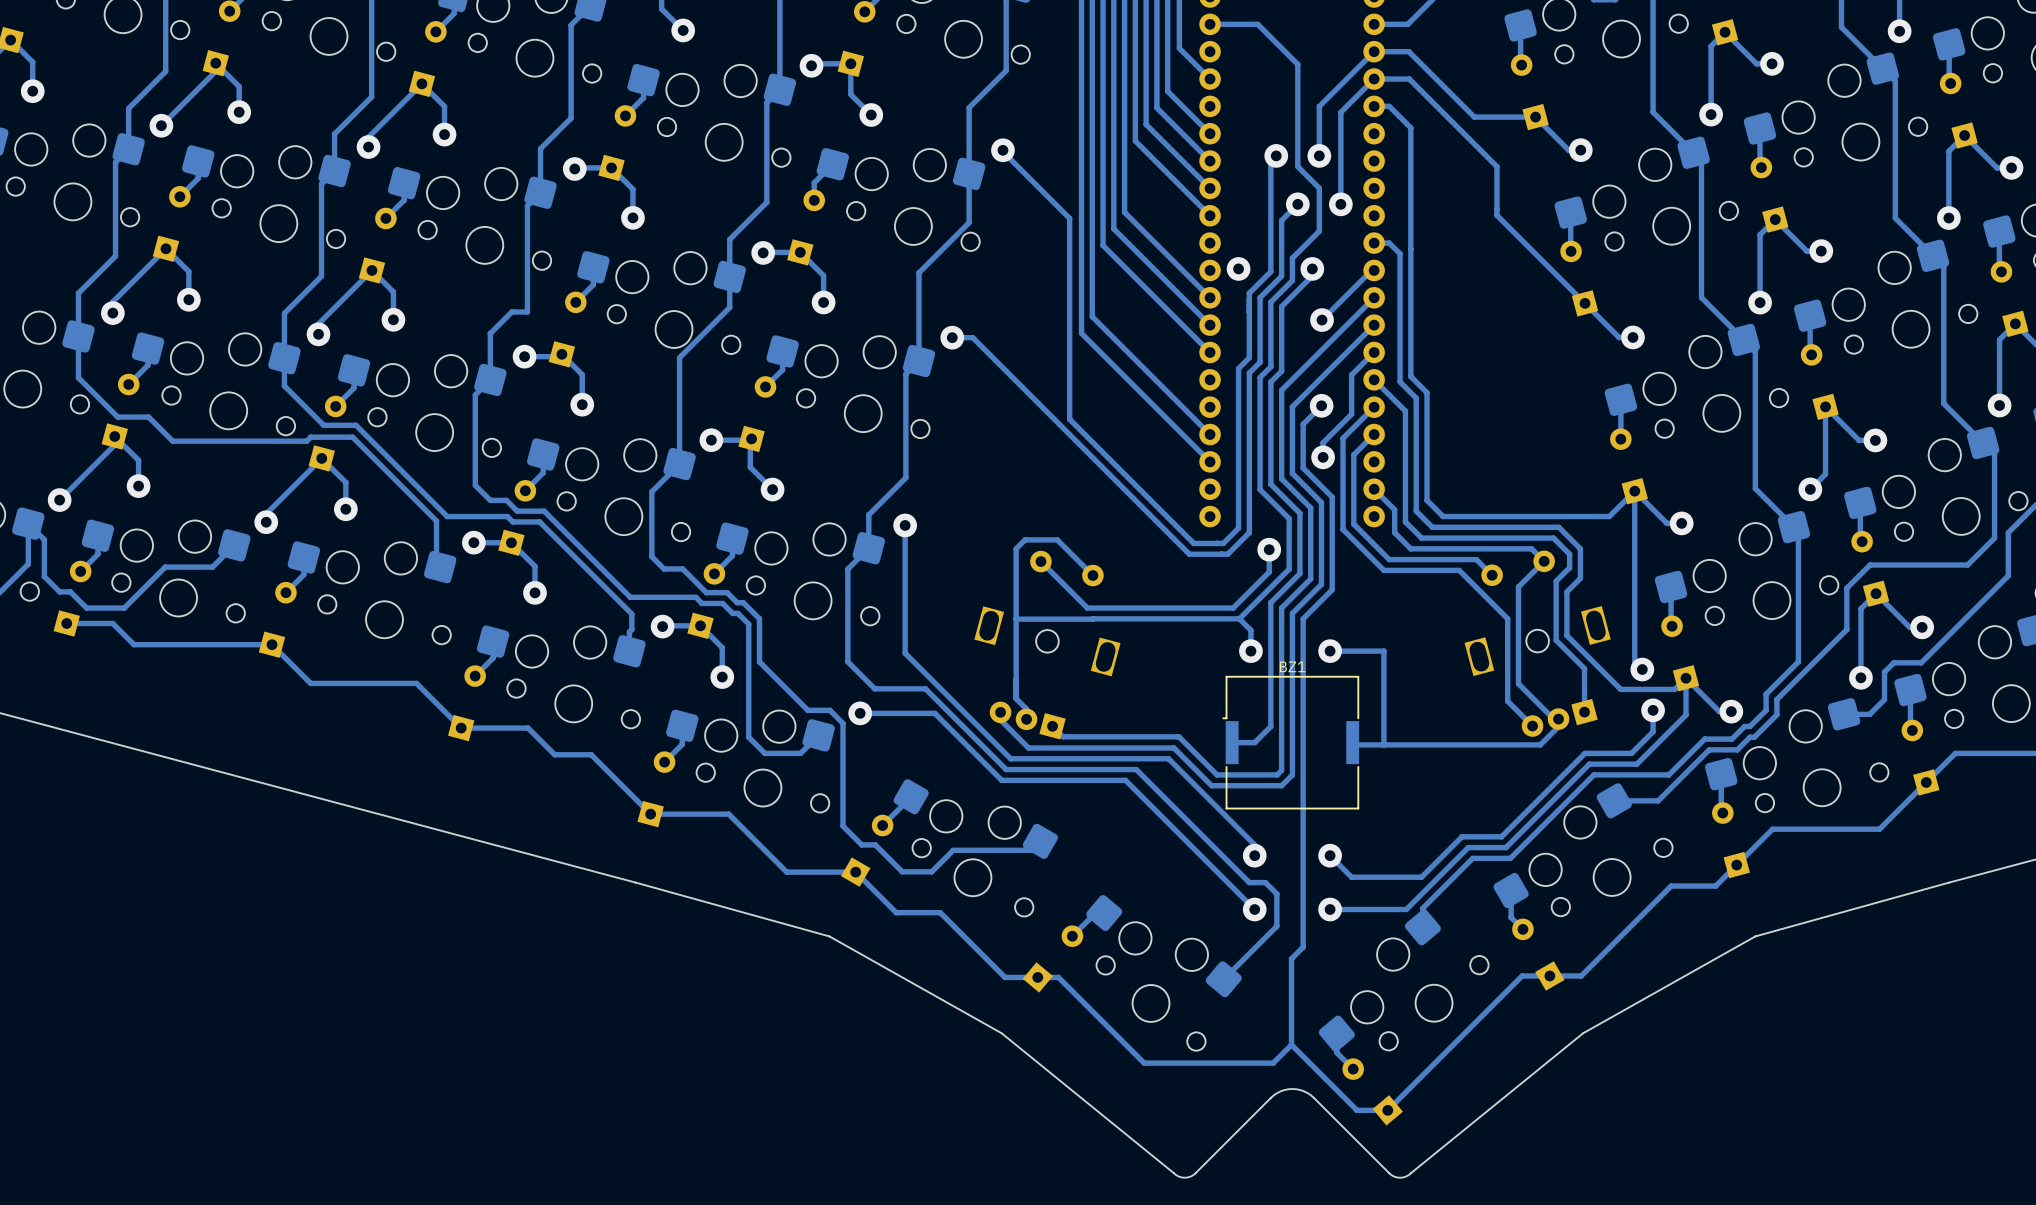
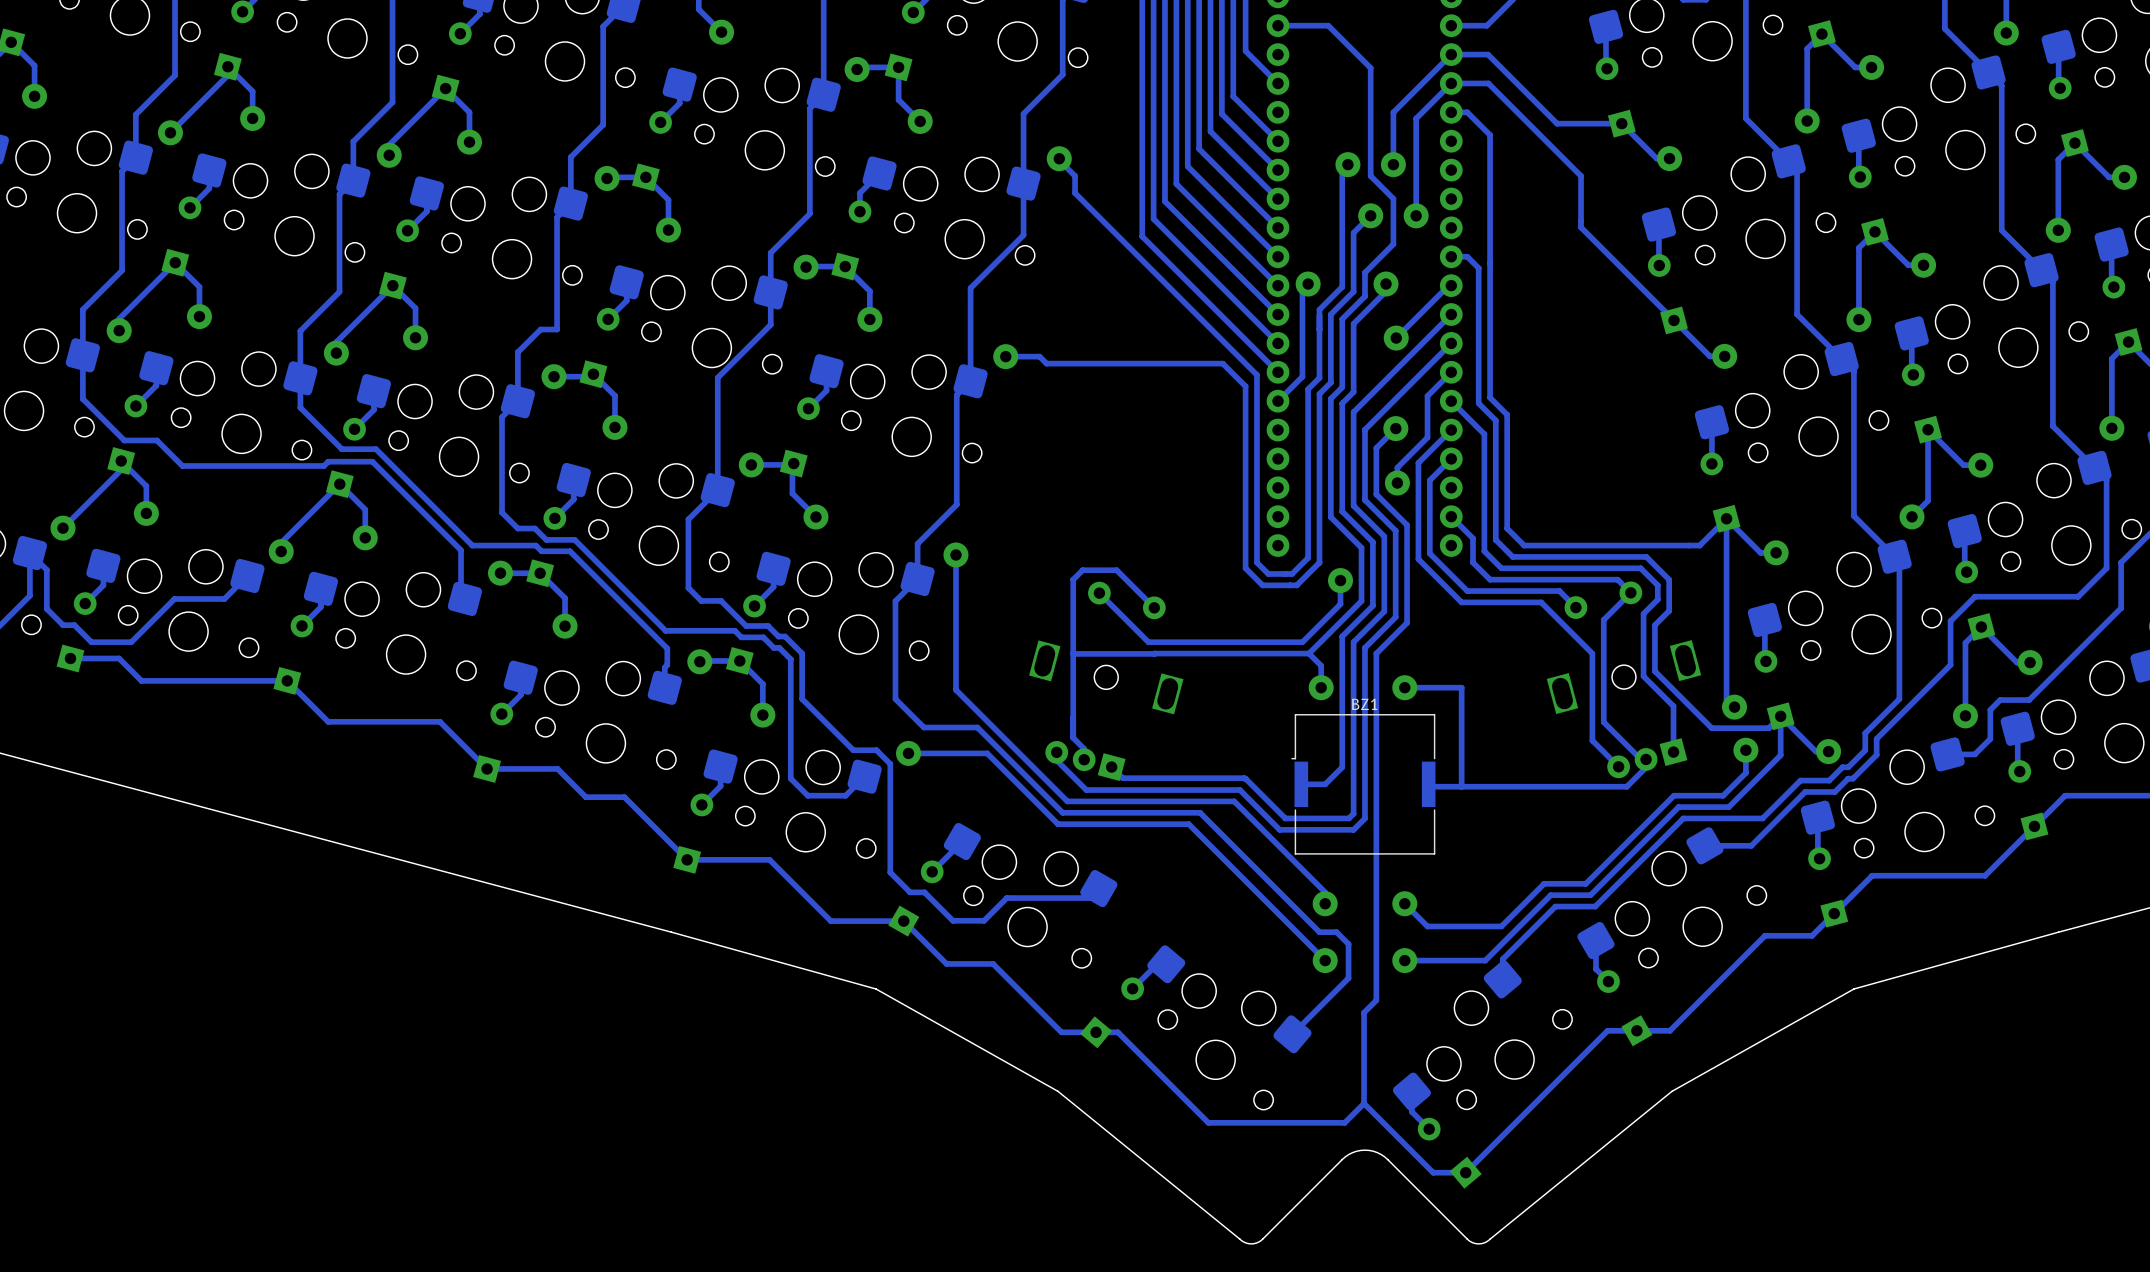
track: (1124, 157) (1124, 212) -> (1187, 166) (1278, 256)
track: (1017, 166) (1069, 218) (1069, 419) (1193, 543) (1200, 543) -> (1075, 176) (1075, 193) (1256, 375) (1256, 562) (1268, 573)
track: (1113, 174) (1113, 228) -> (1153, 218) (1176, 241)
track: none -> (1176, 183) (1278, 285)
track: (1103, 190) (1103, 245) -> (1164, 201) (1187, 224)
track: (1092, 207) (1092, 316) (1210, 434) -> none
track: (1081, 223) (1081, 333) (1210, 461) -> (1142, 236) (1164, 259)
track: none -> (1308, 284) (1302, 289) (1302, 376) (1278, 401)
track: (972, 337) (1189, 554) (1195, 554) -> (1027, 356) (1039, 356) (1046, 363) (1222, 363) (1245, 386) (1245, 568) (1262, 585)

